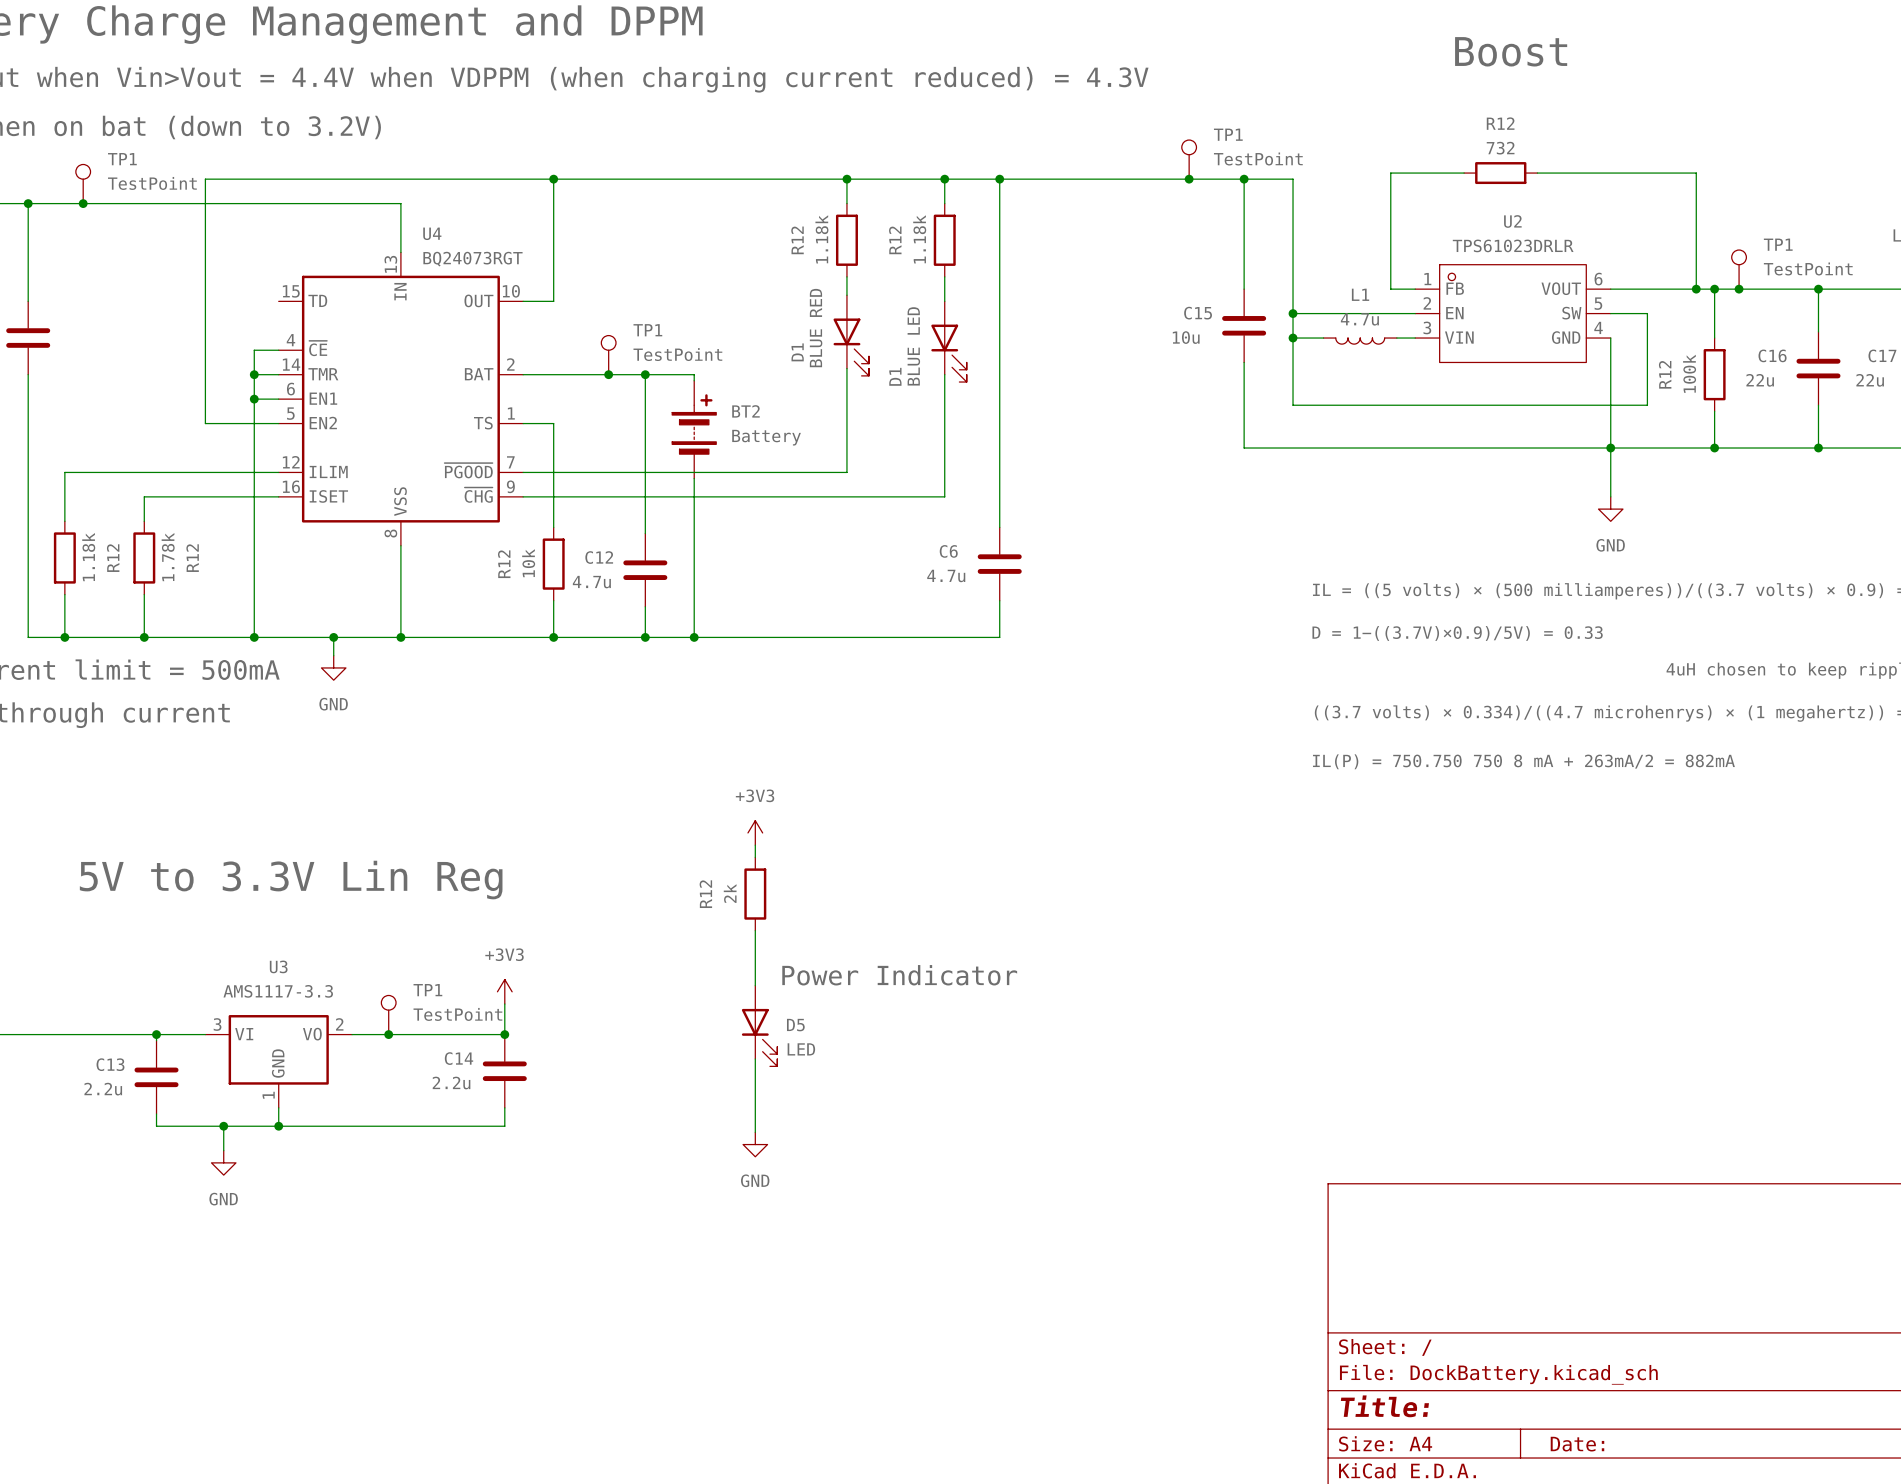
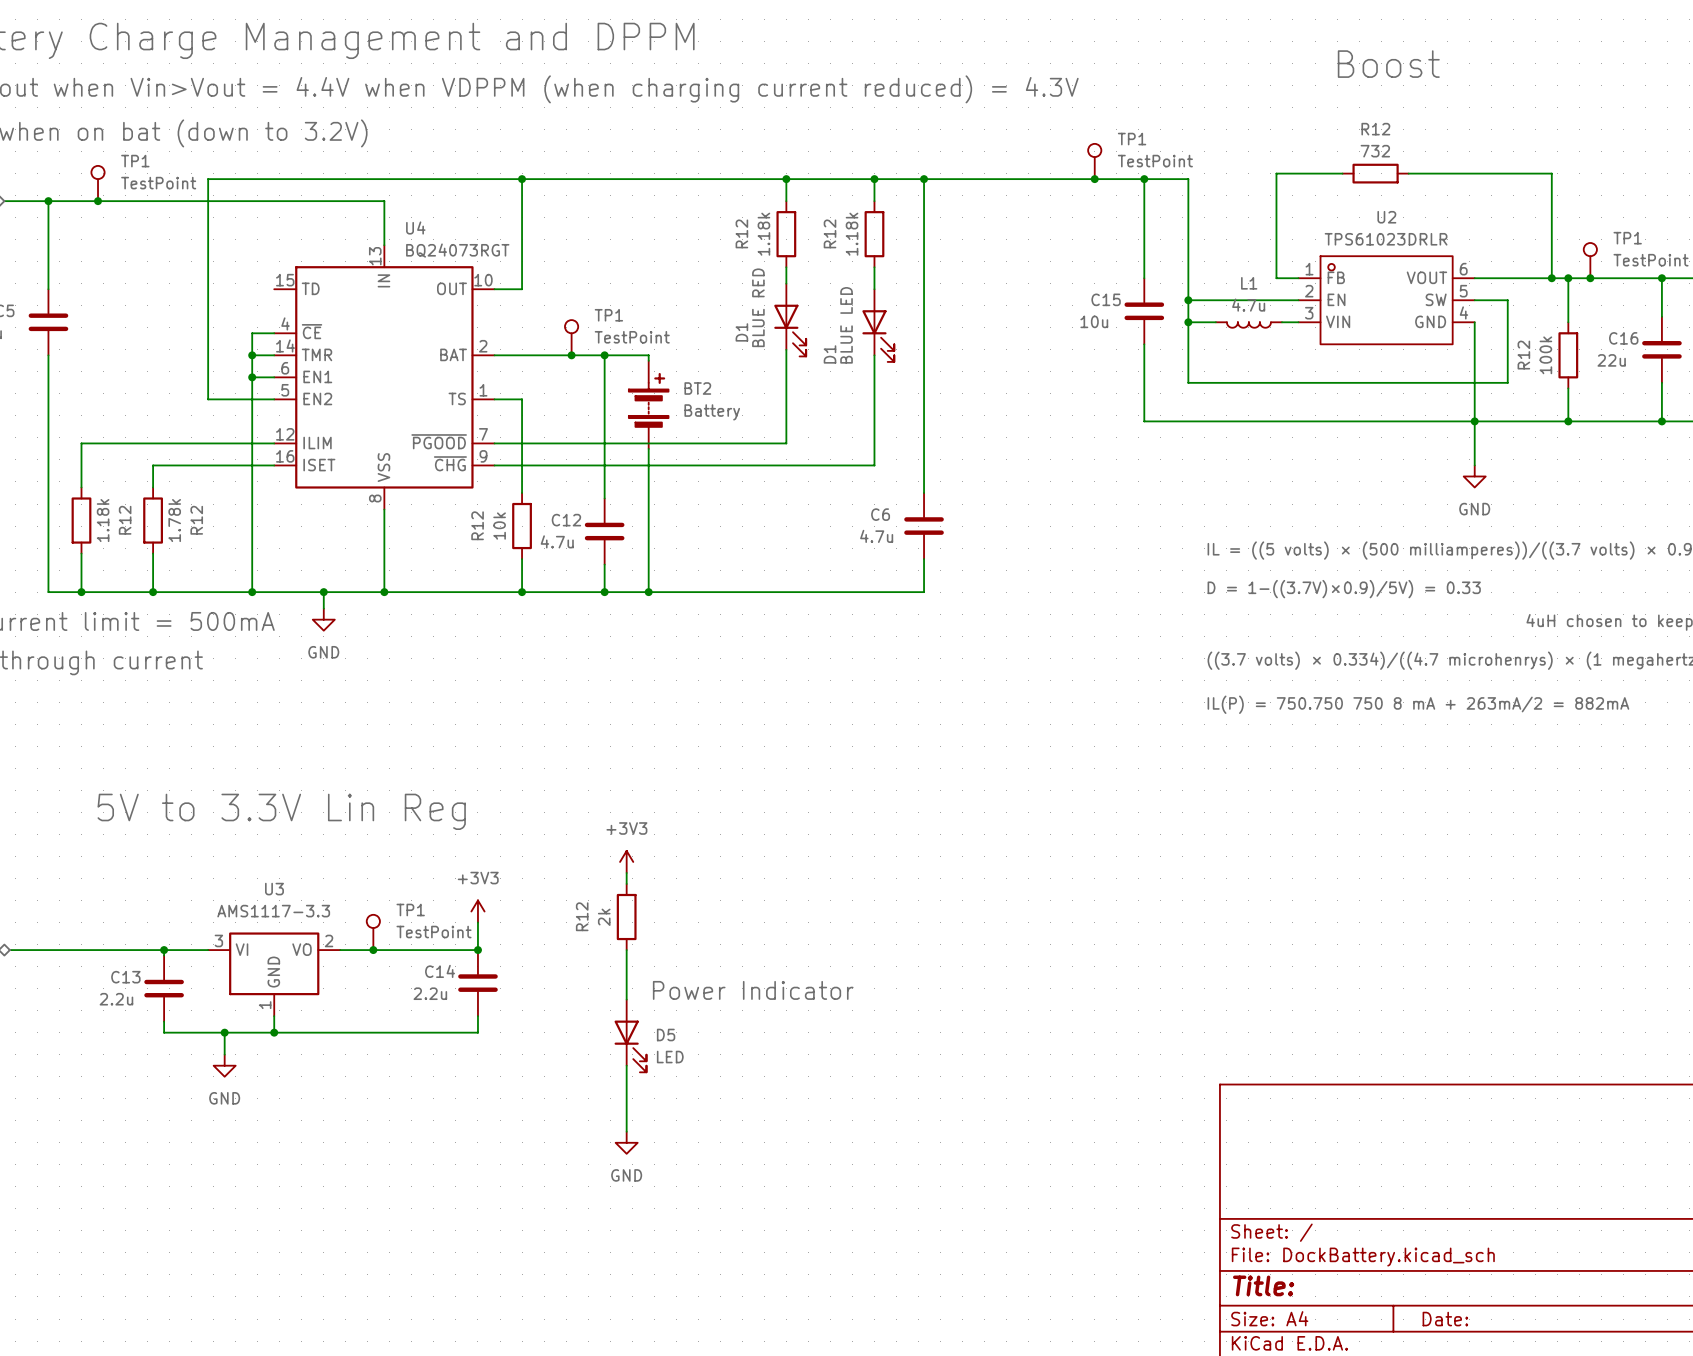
power symbol position: +3V3 (755, 832) -> +3V3 (626, 861)
wire: (755, 845) (755, 857) -> (626, 872) (626, 883)
R12 position: (755, 894) -> (626, 917)
wire: (755, 930) (755, 985) -> (626, 950) (626, 999)
label position: Power Indicator (899, 975) -> Power Indicator (753, 990)
D5 position: (759, 1026) -> (630, 1035)
wire: (755, 1059) (755, 1132) -> (626, 1065) (626, 1131)
power symbol position: GND (755, 1144) -> GND (626, 1142)

